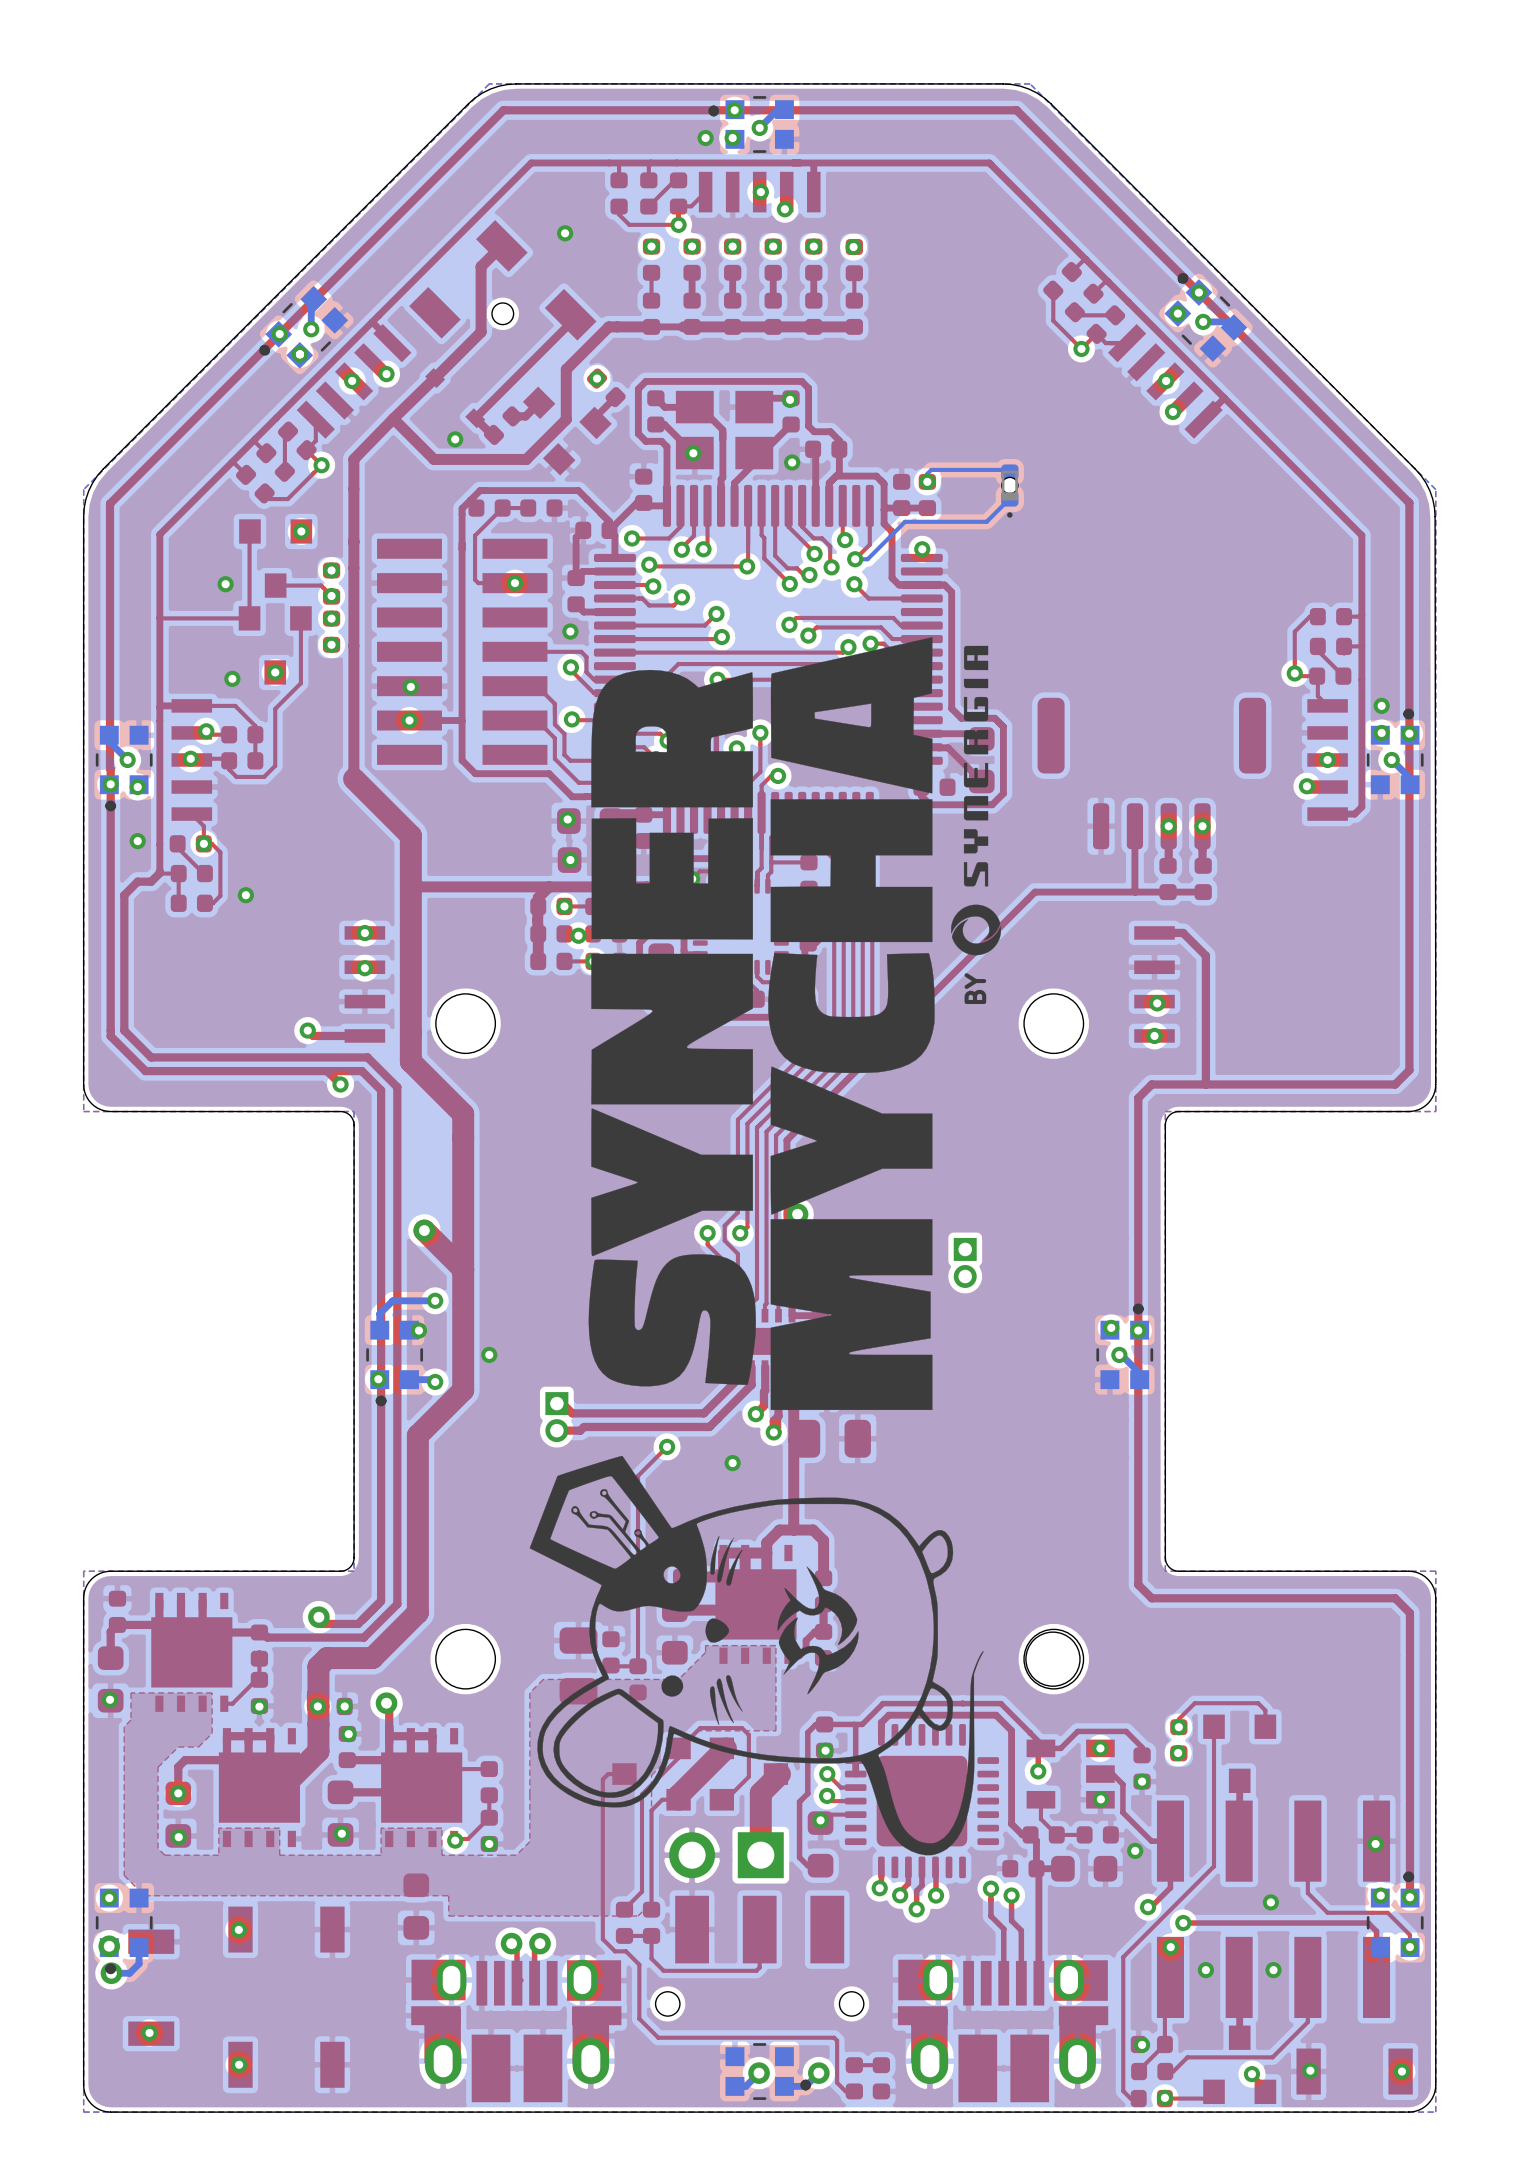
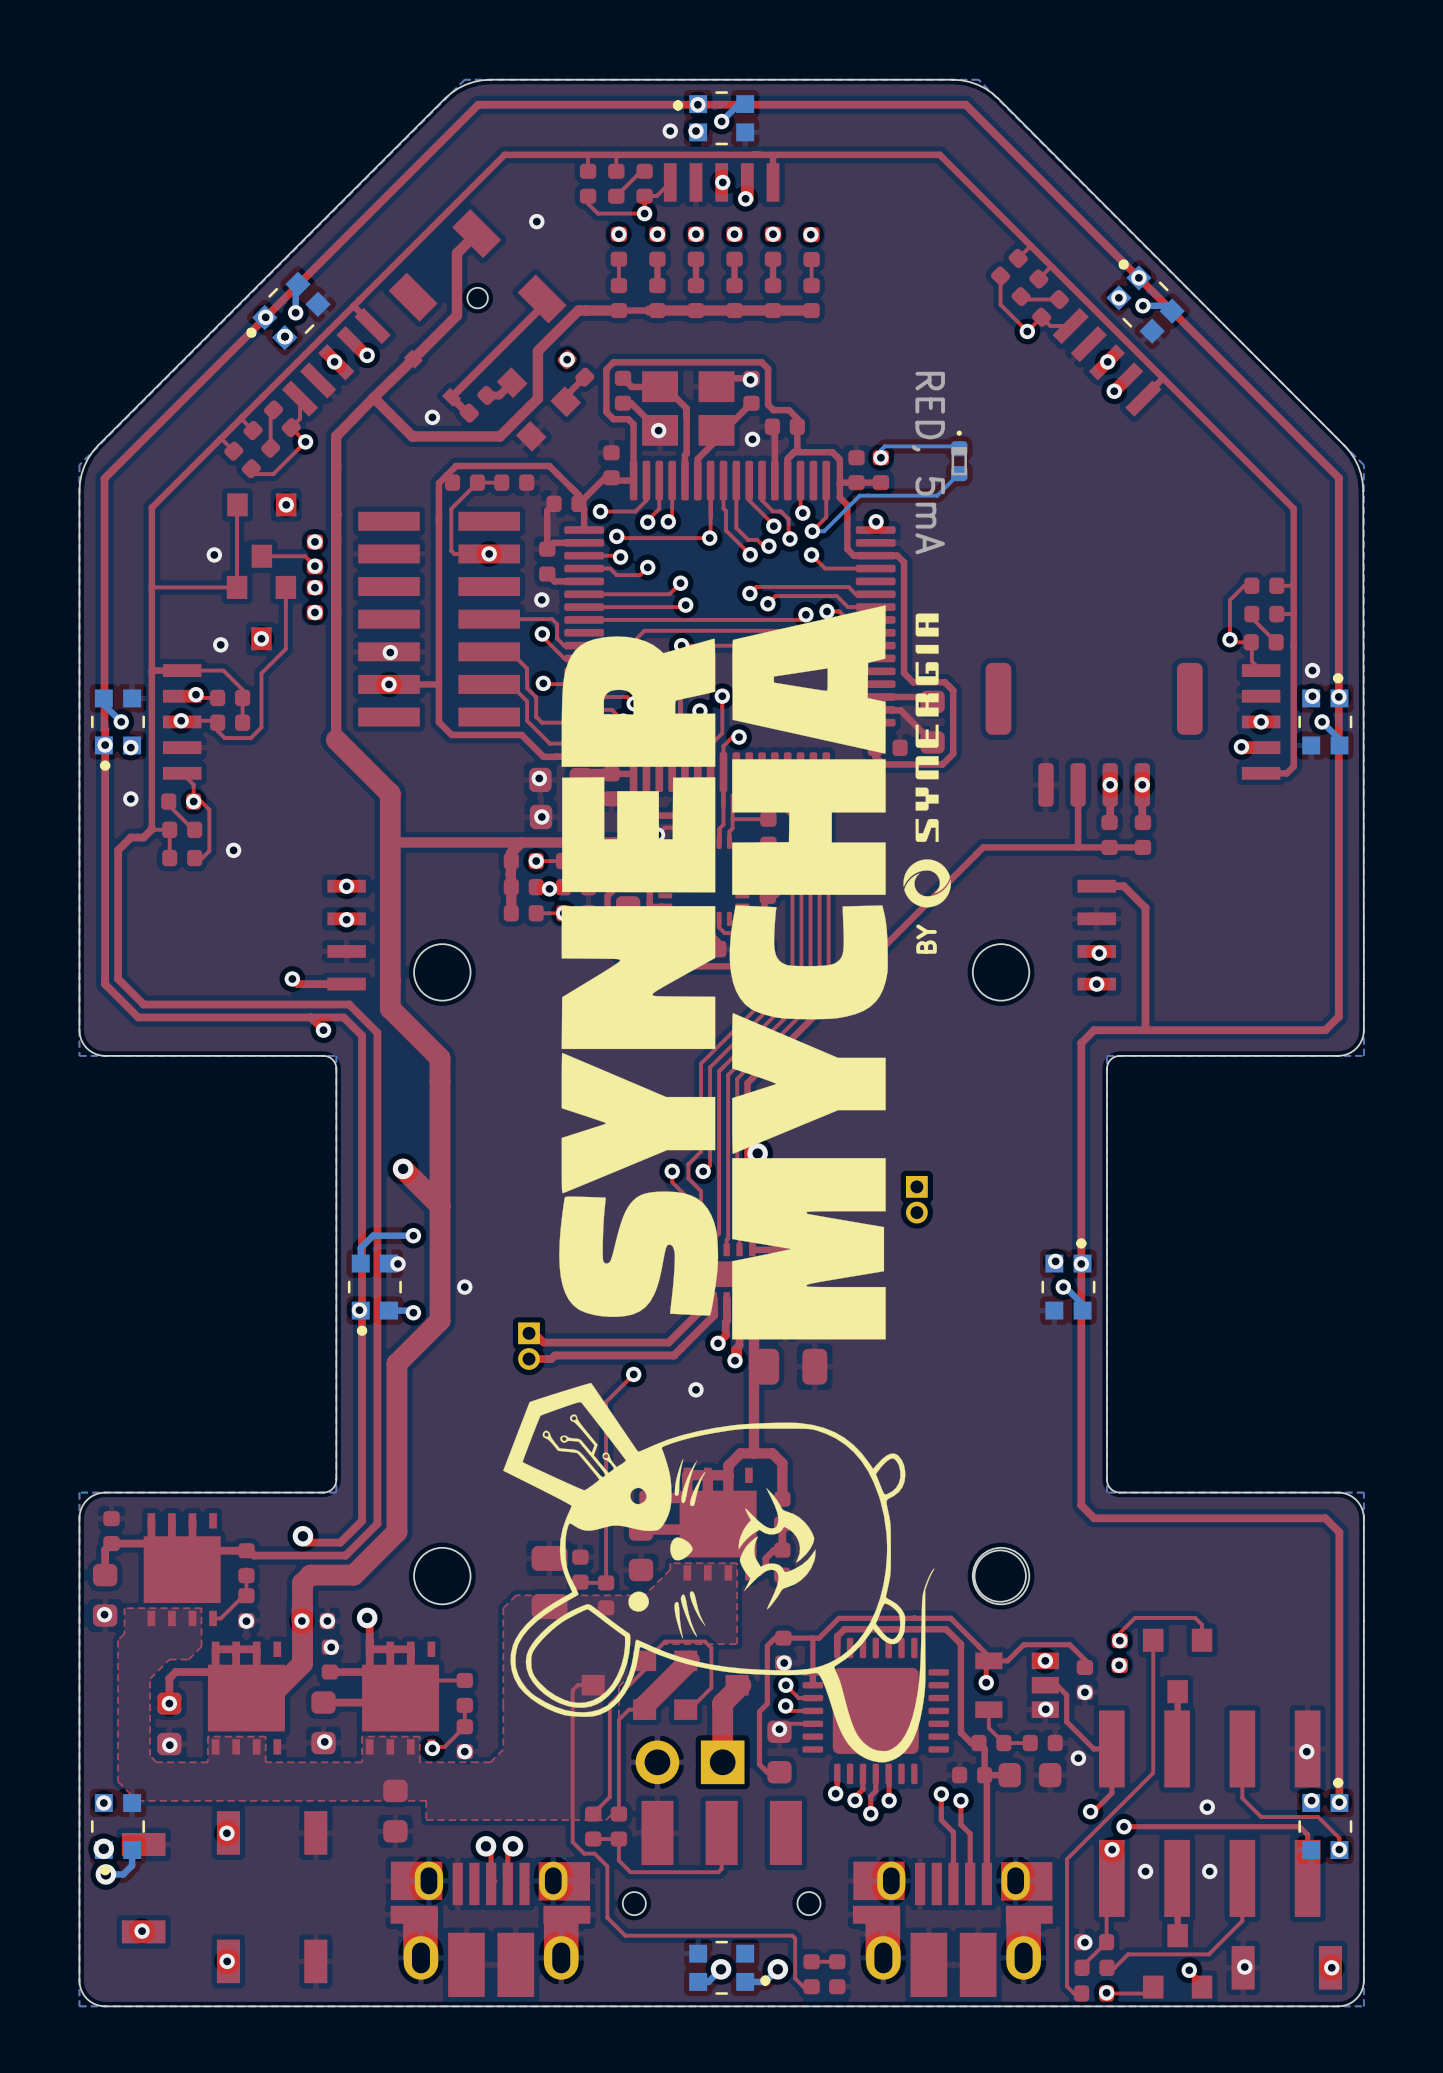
part: none -> RED, 5mA (959, 455)
part: (1009, 485) -> none
part: (1009, 491) -> none

